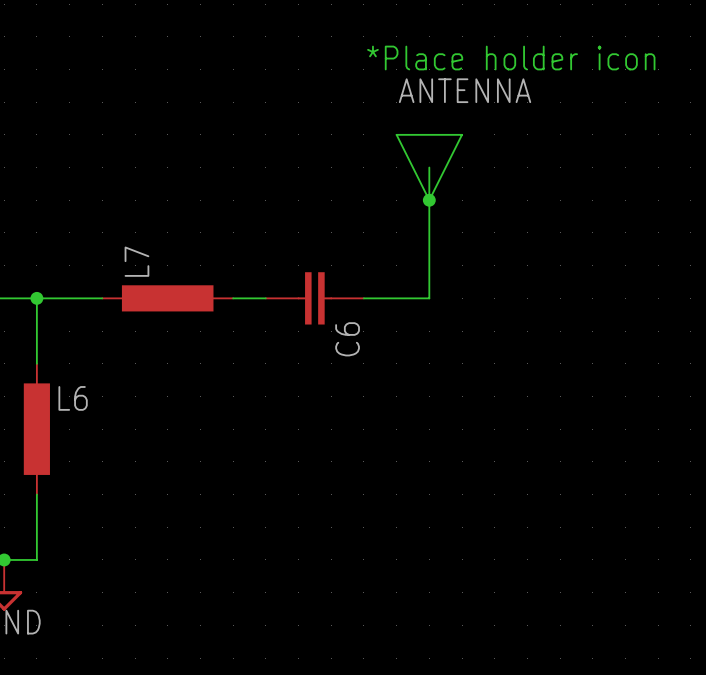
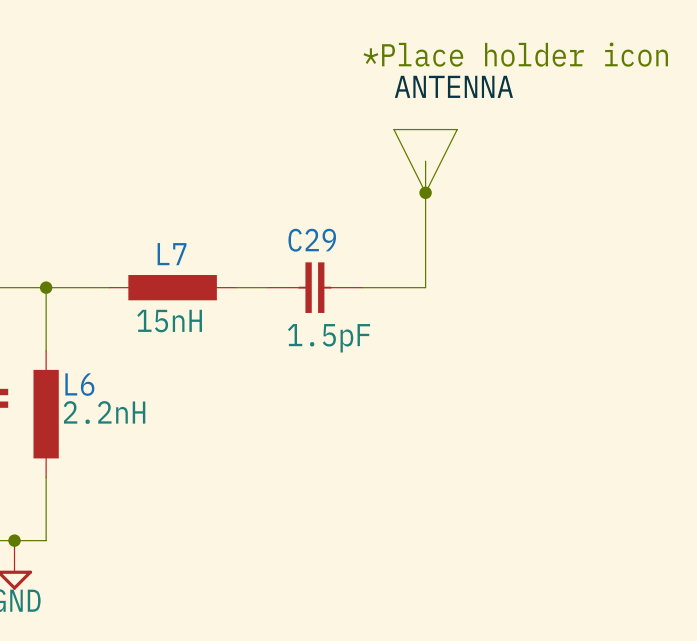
L7 name rotation: 0° (136, 261) -> 90° clockwise (172, 254)
L7 value: none -> 15nH (169, 321)
C6 name: C6 (347, 339) -> C29 (312, 240)
C6 value: none -> 1.5pF (329, 338)
L6 value: none -> 2.2nH (104, 412)

